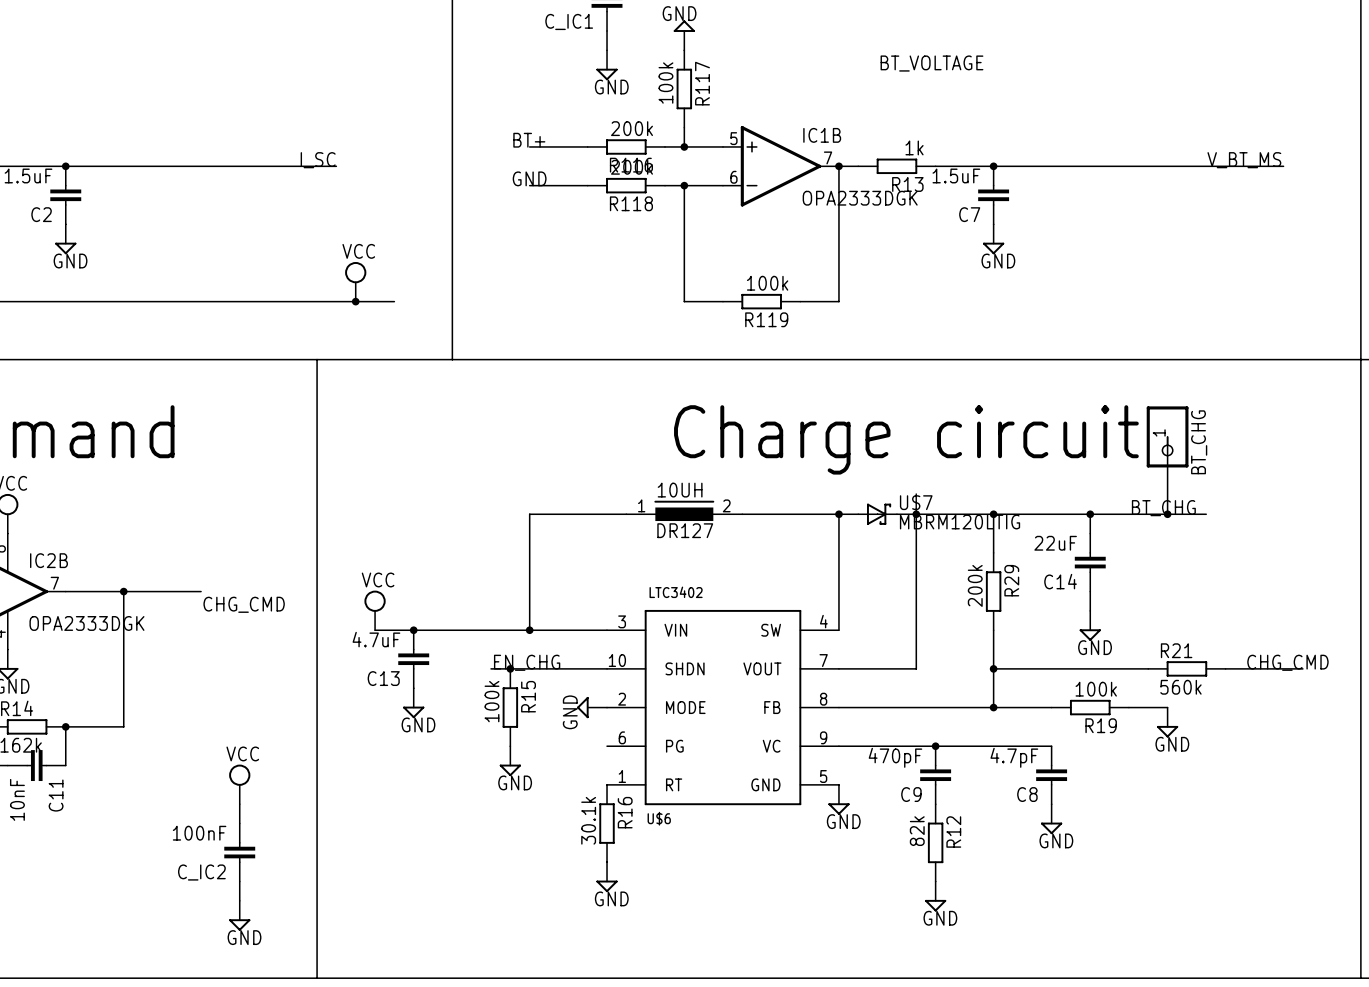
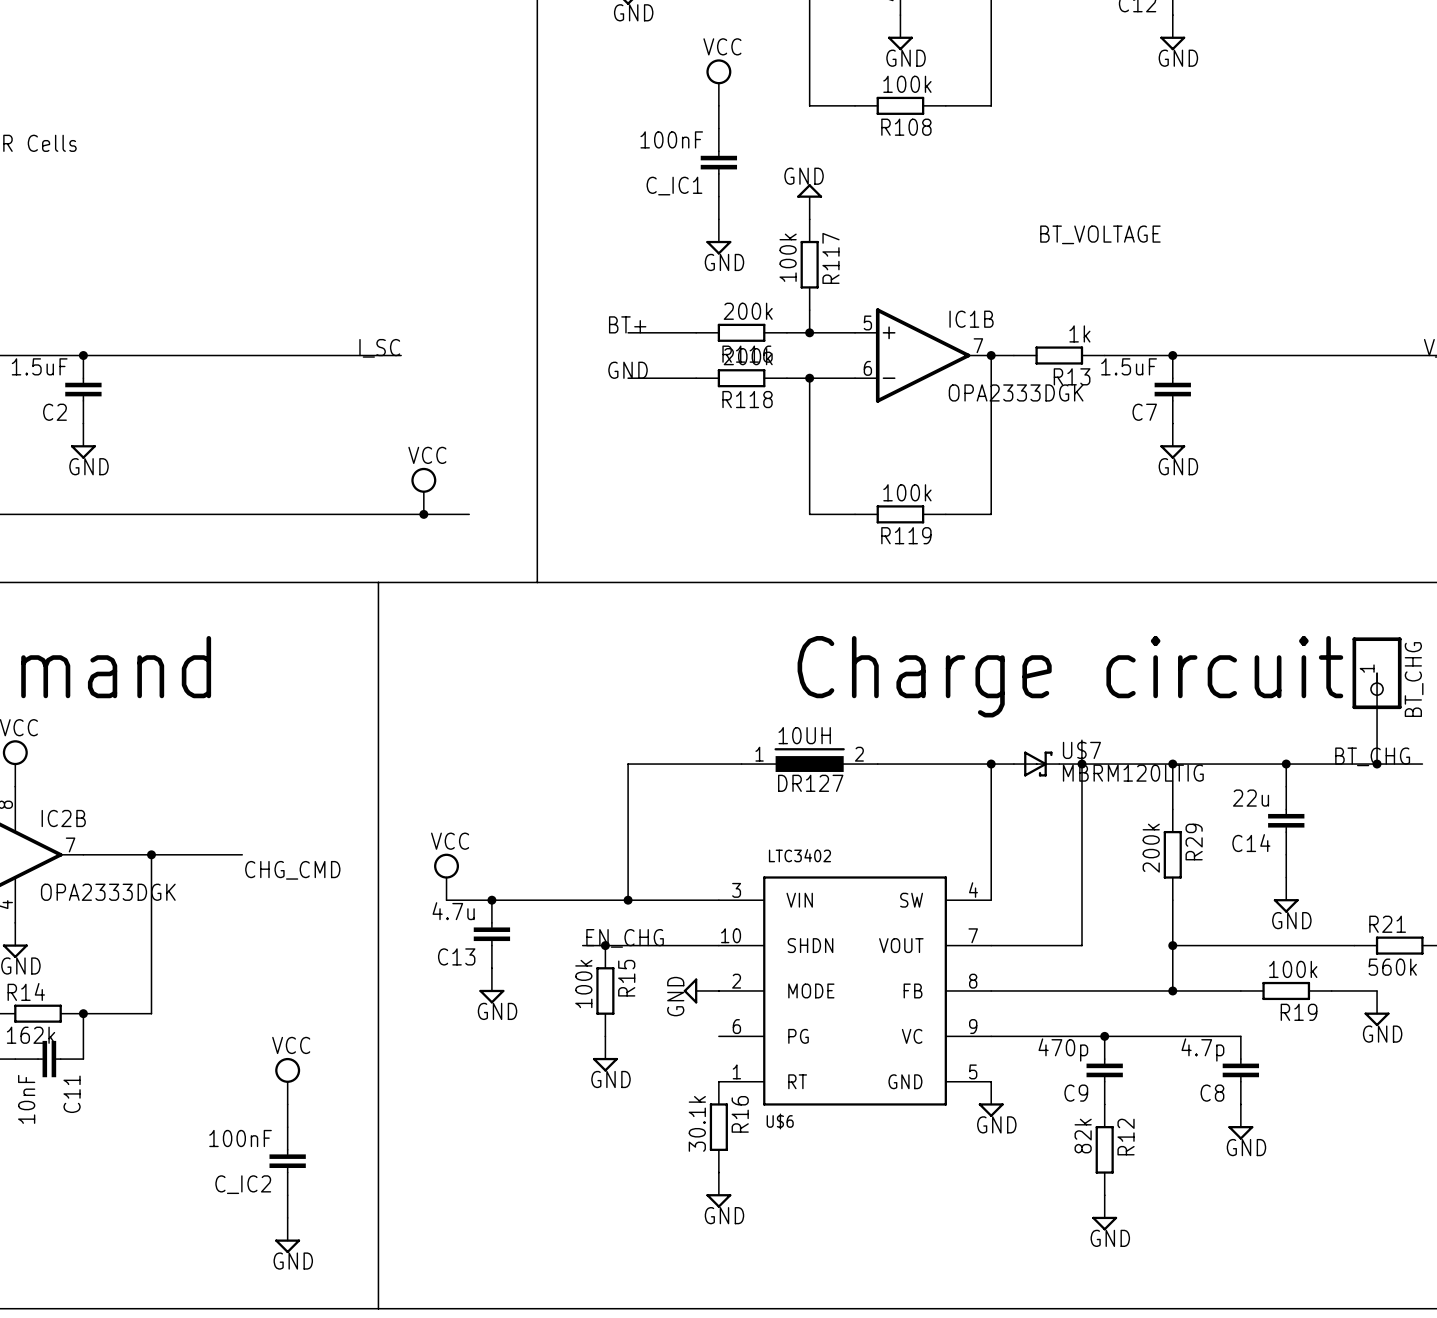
C14 value: 22uF (1055, 543) -> 22u (1251, 798)
C13 value: 4.7uF (376, 639) -> 4.7u (453, 911)
C9 value: 470pF (895, 757) -> 470p (1063, 1049)
C8 value: 4.7pF (1014, 757) -> 4.7p (1202, 1049)

